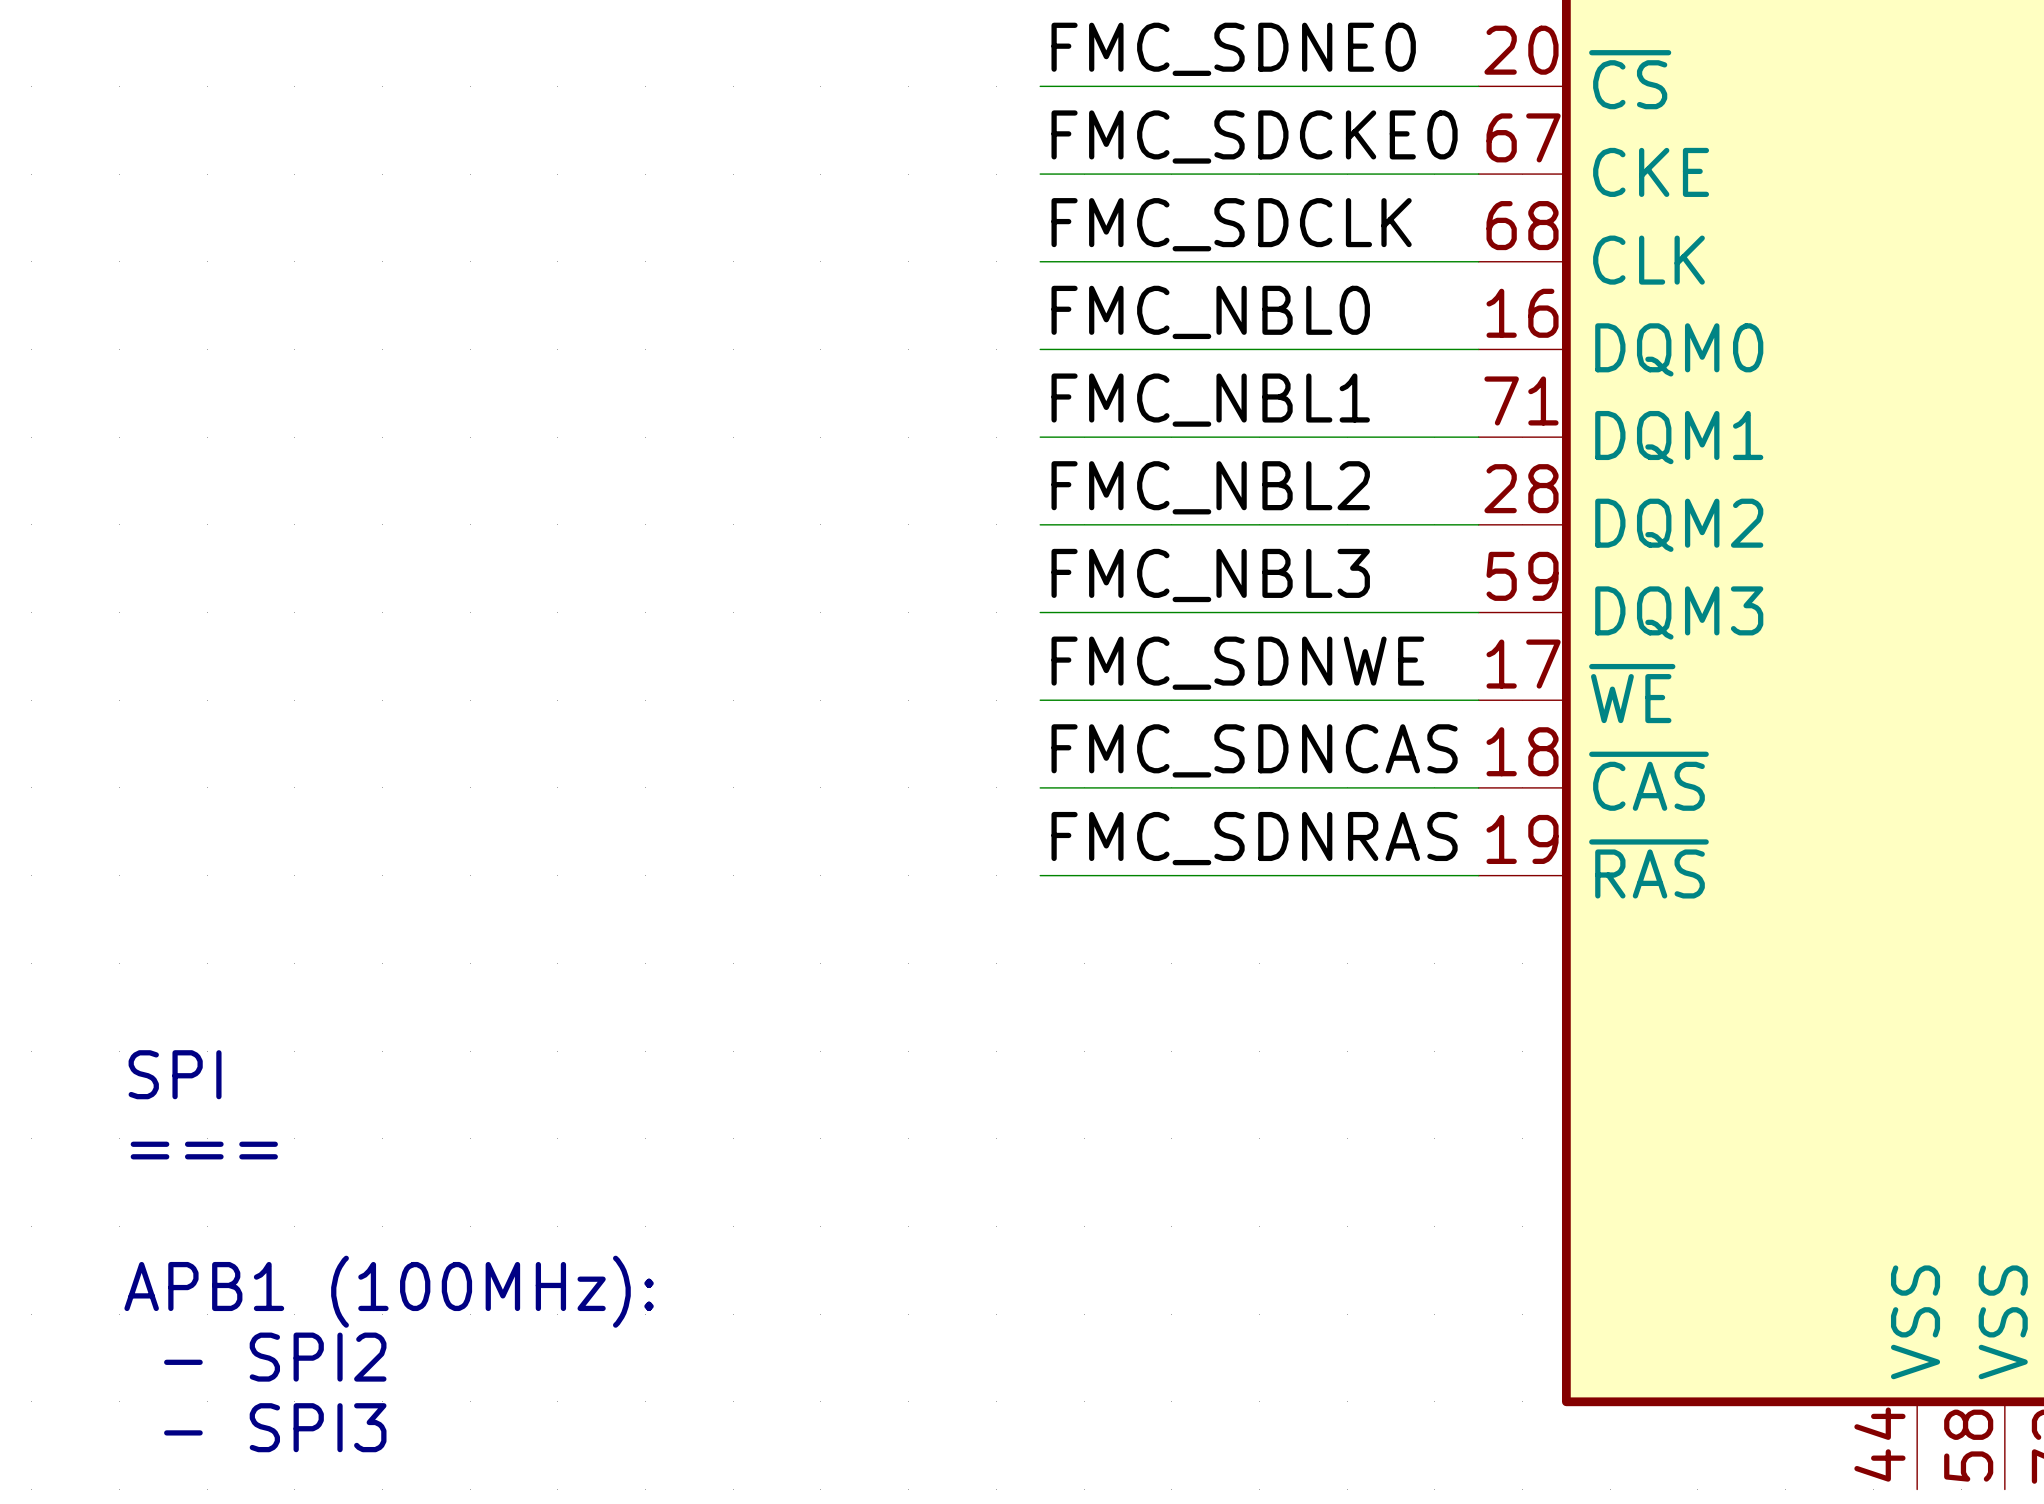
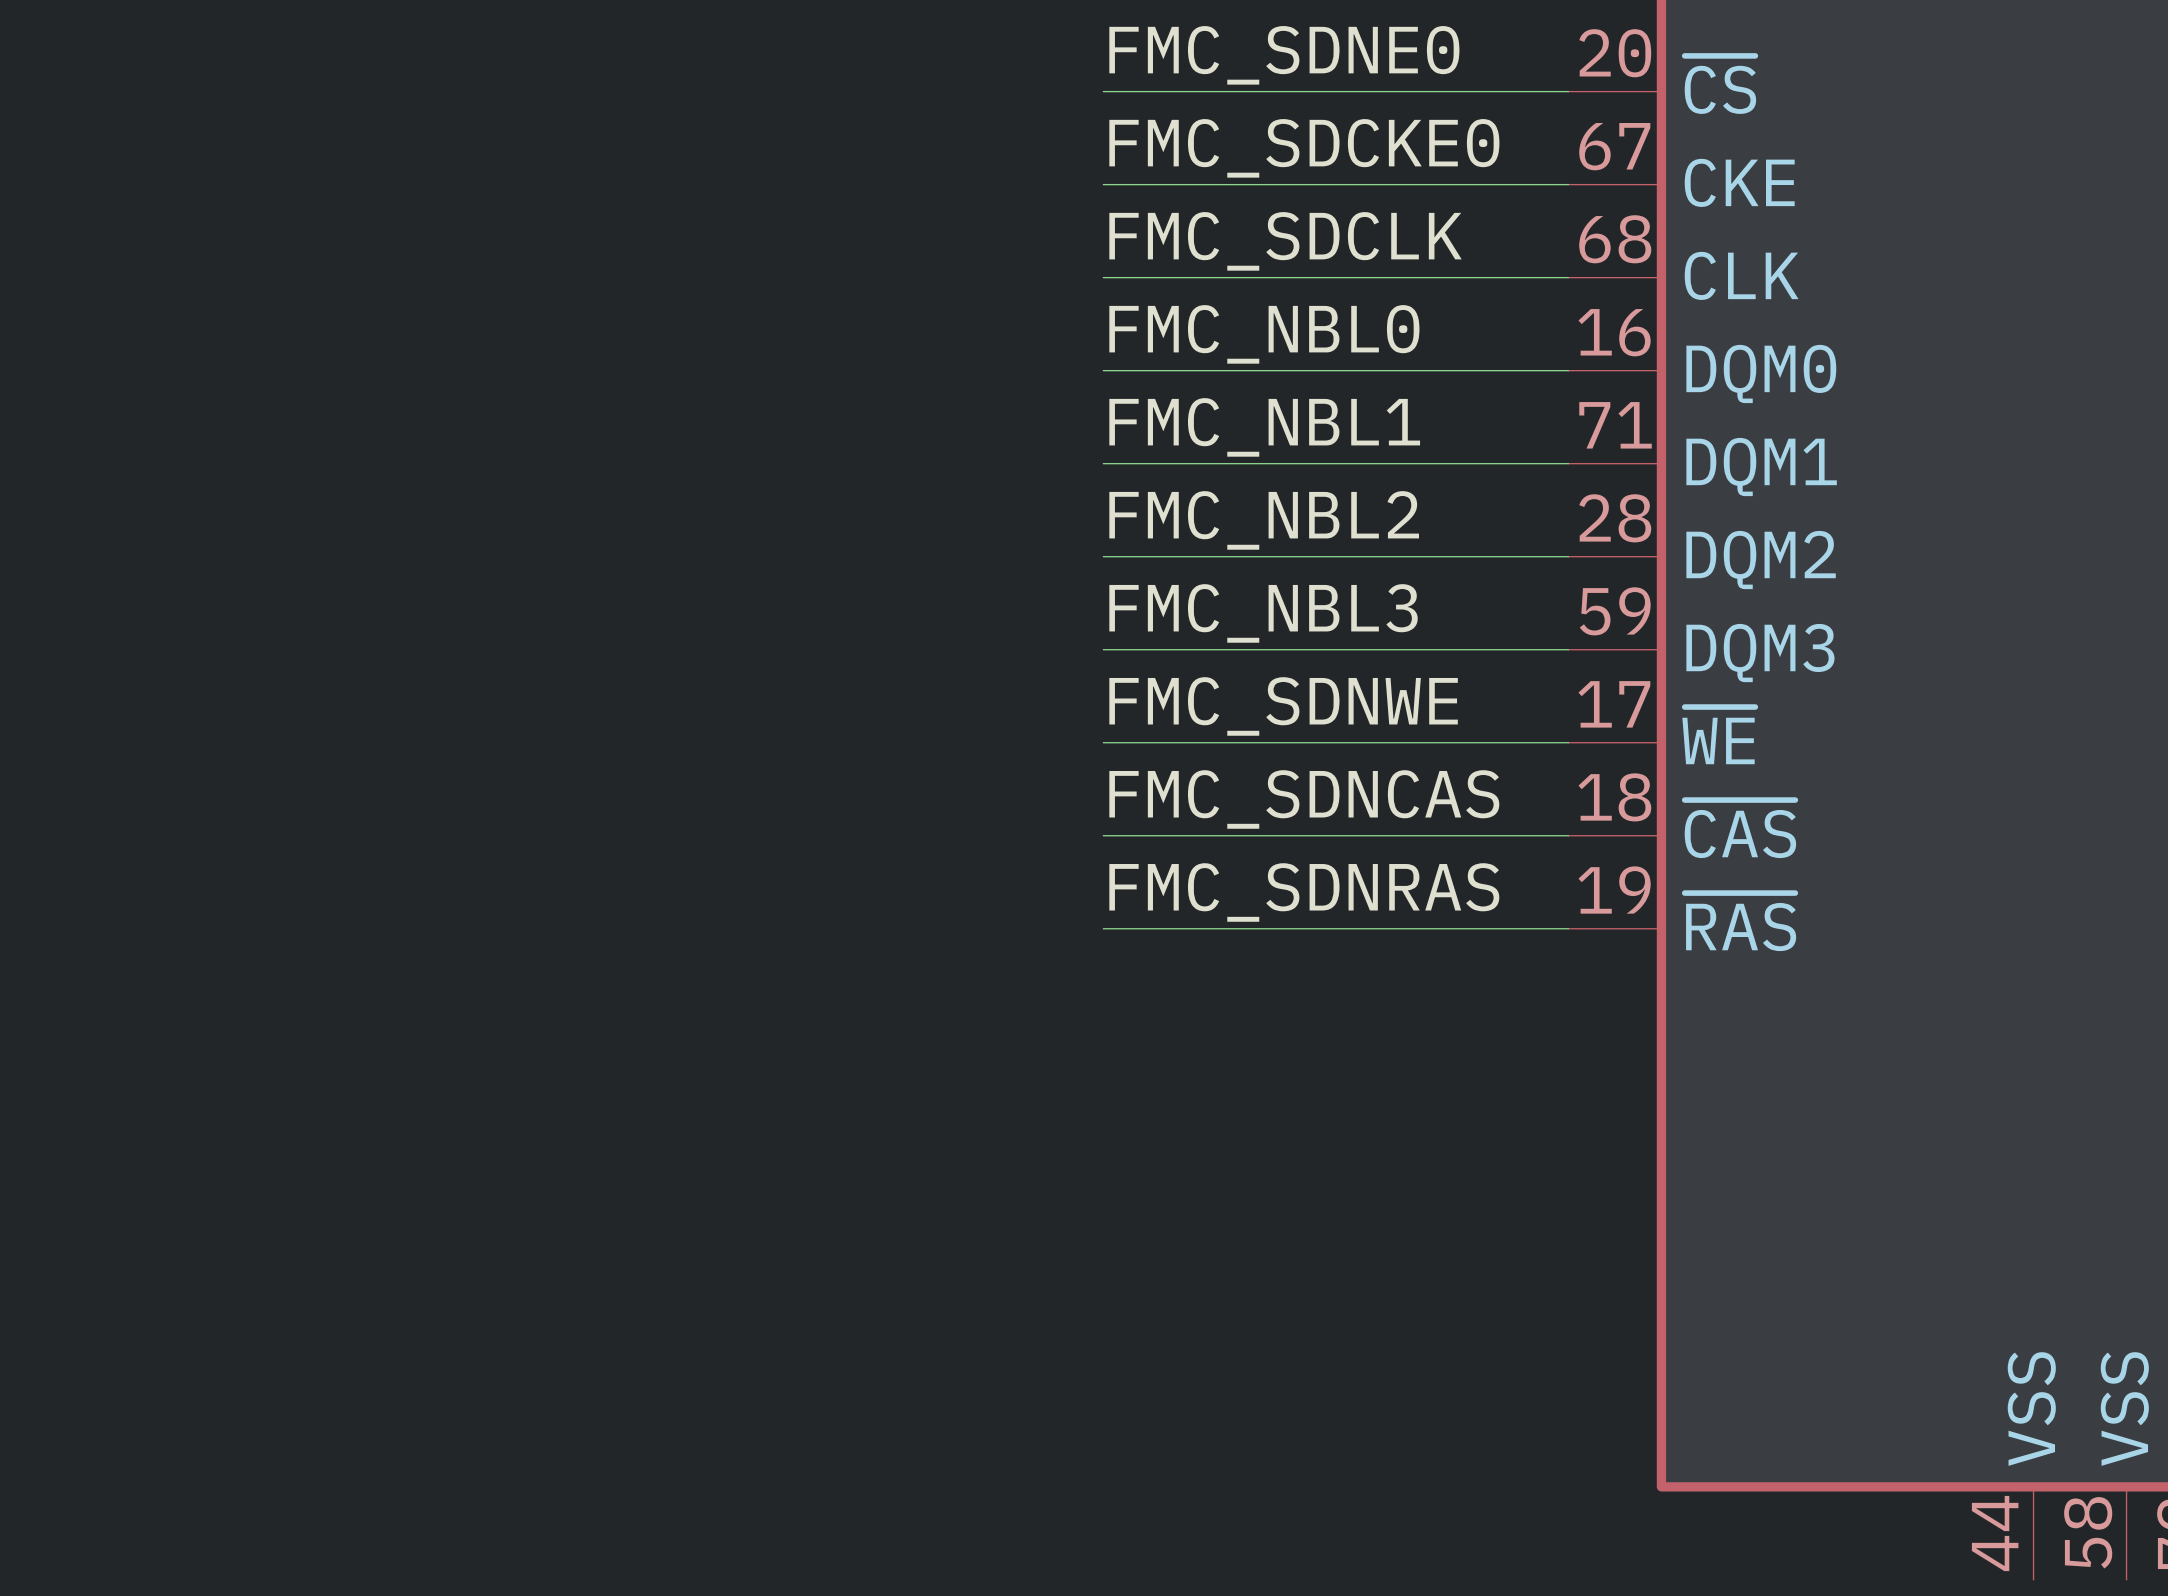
text: SPI (175, 1074) -> none
text: === (204, 1150) -> none
text: APB1 (100MHz): (389, 1291) -> none
text: - SPI2 (275, 1357) -> none
text: - SPI3 (275, 1427) -> none

